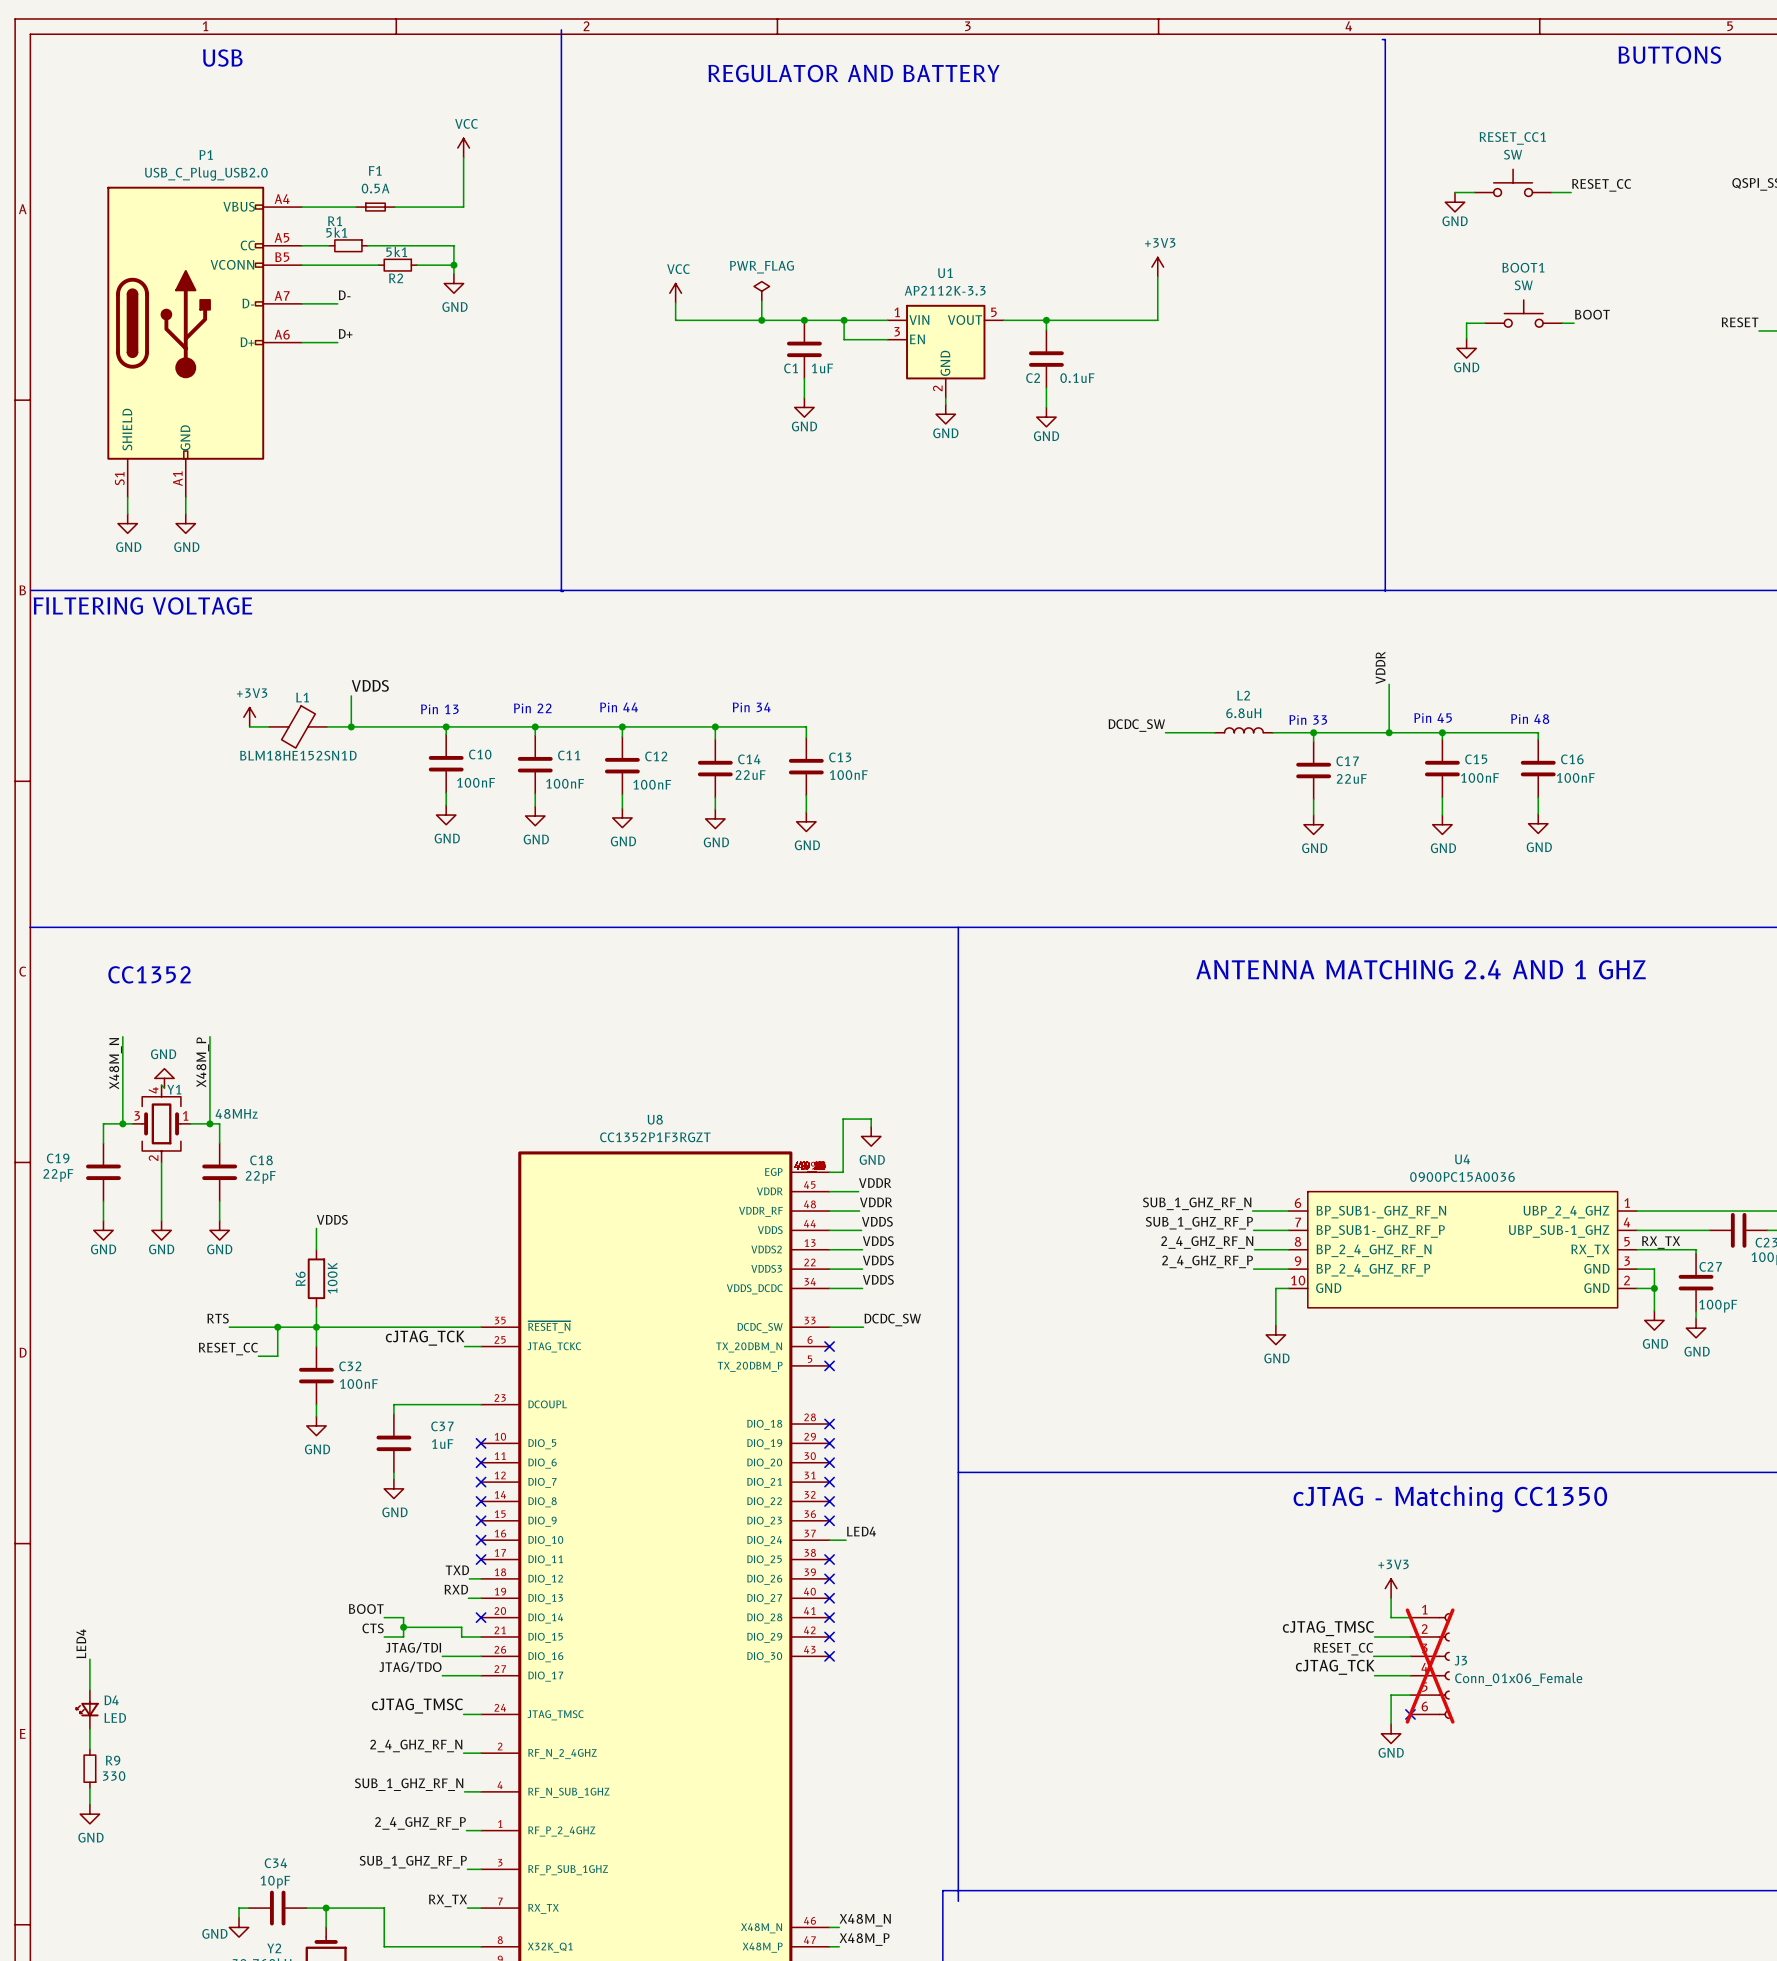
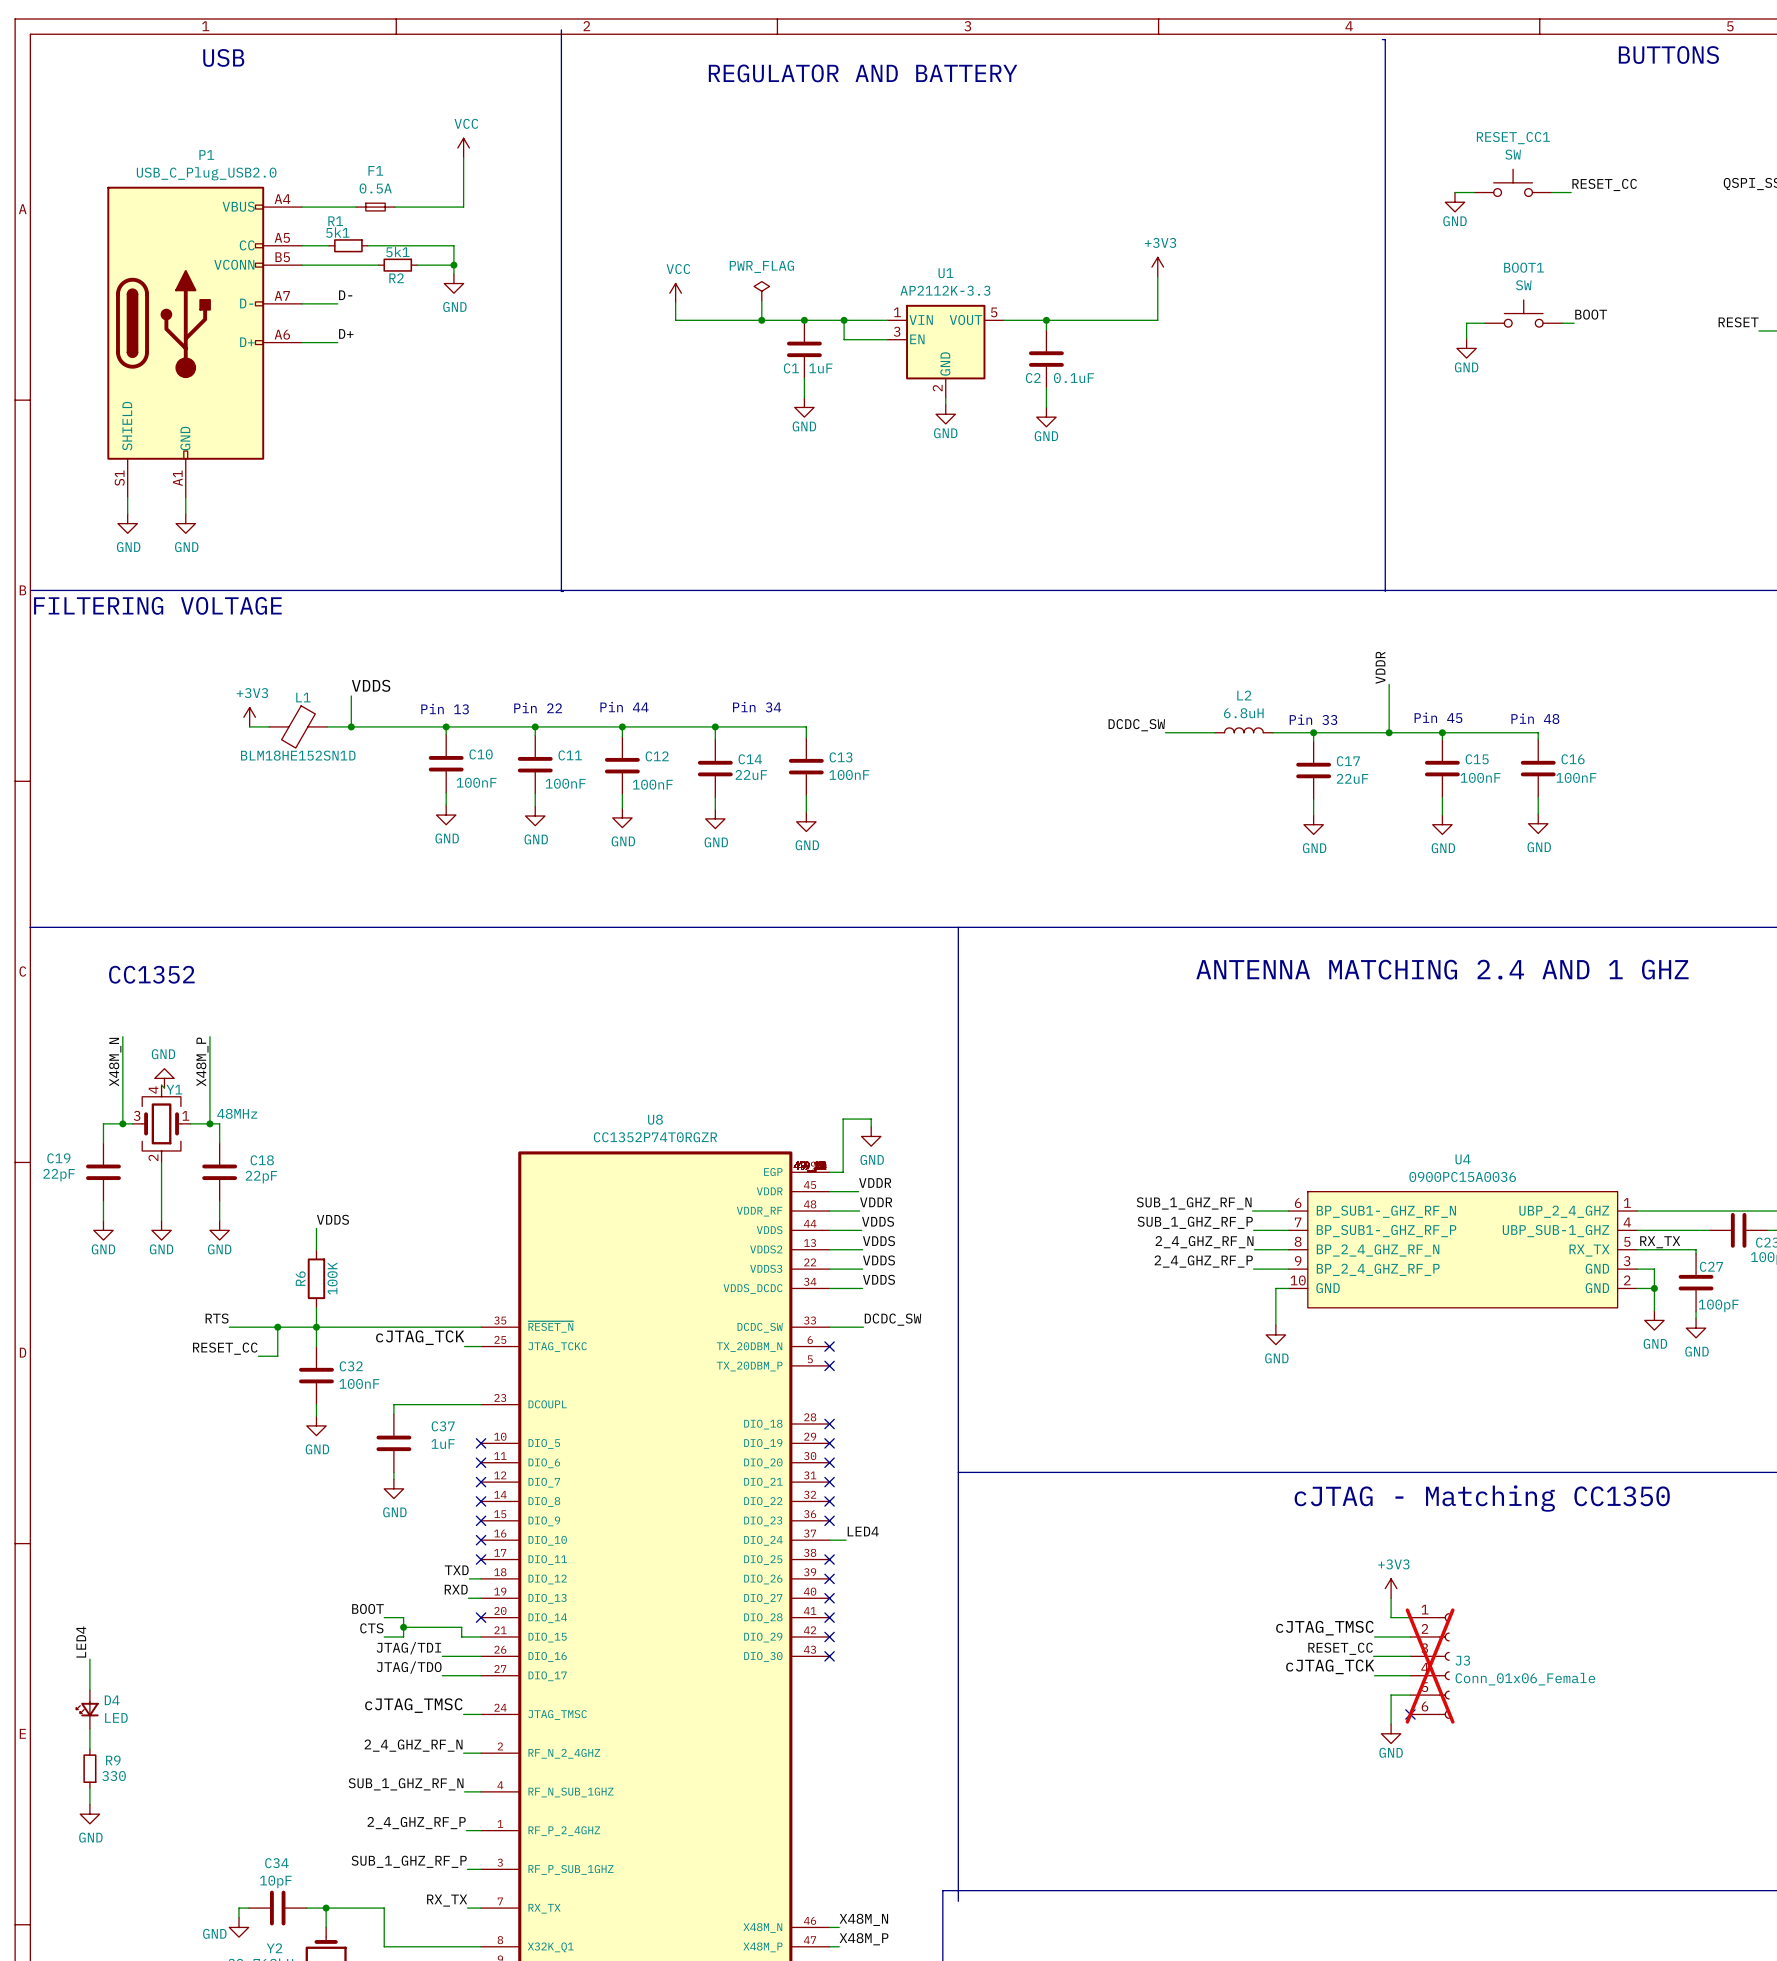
U8 value: CC1352P1F3RGZT (655, 1137) -> CC1352P74T0RGZR (655, 1137)

